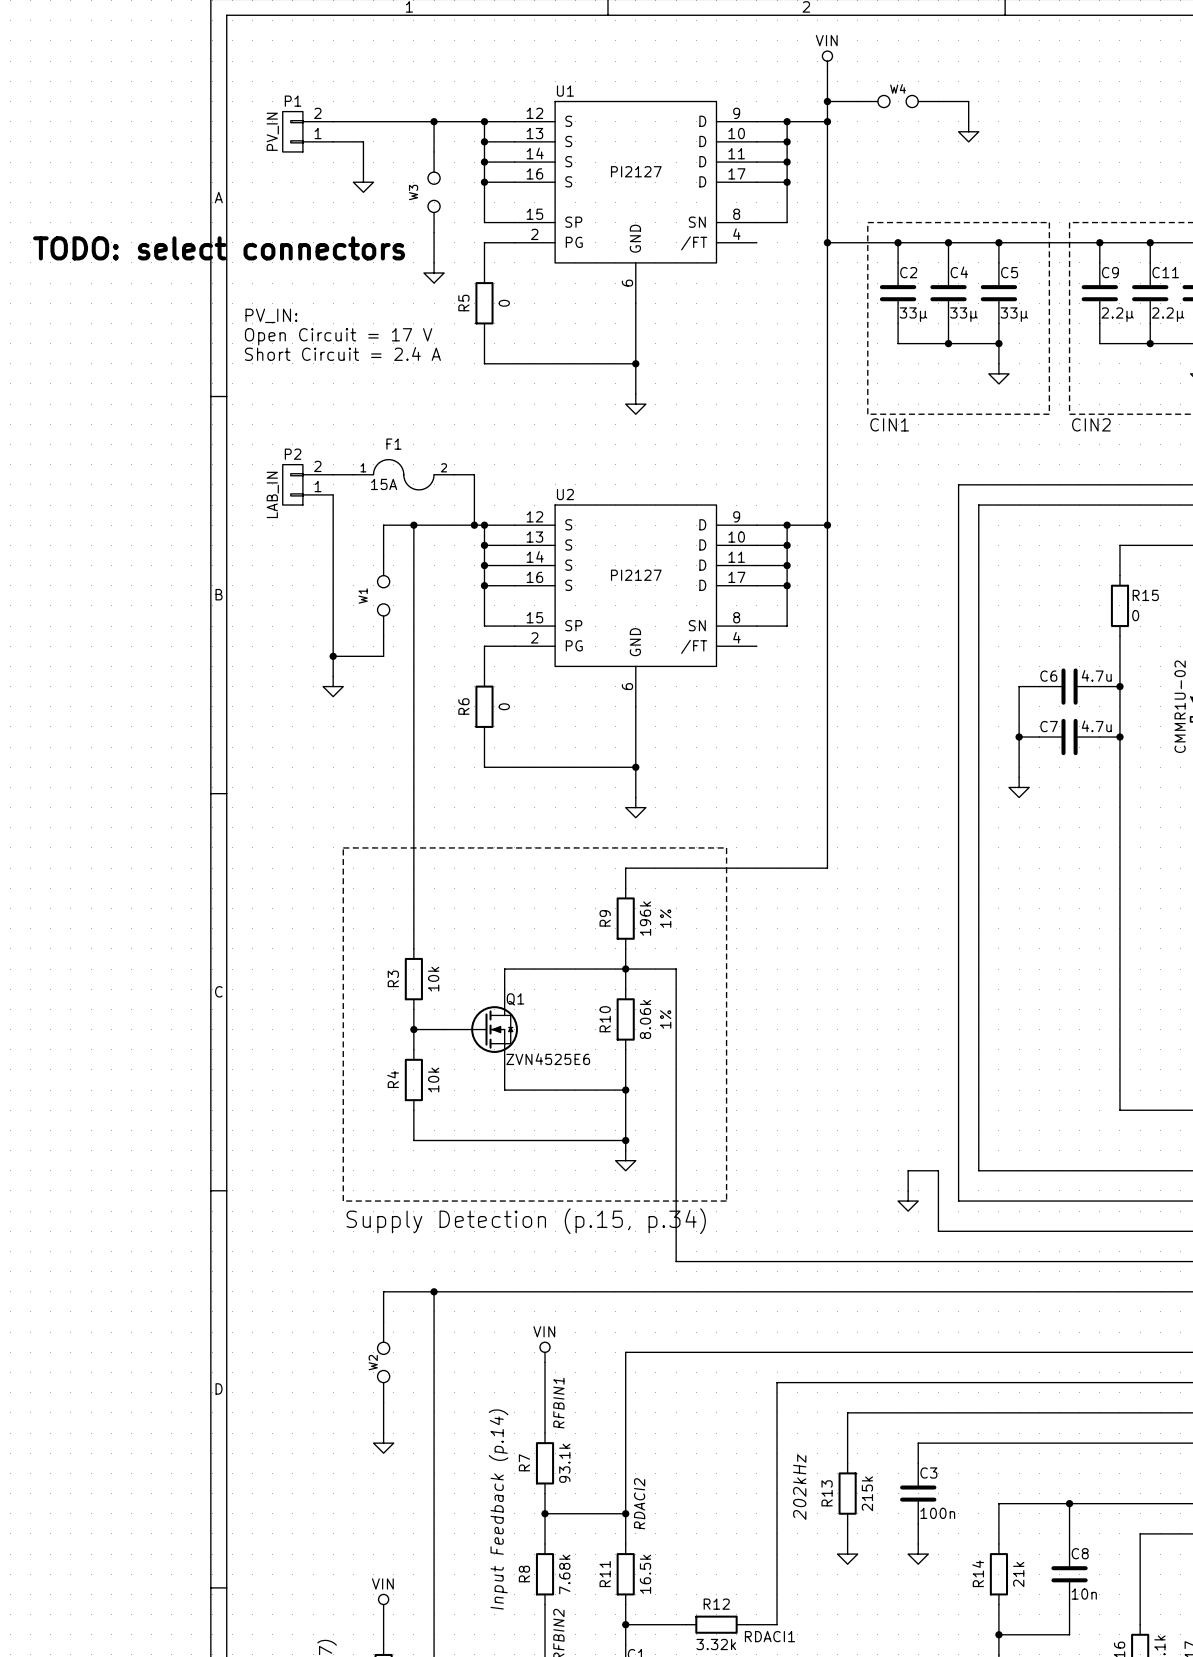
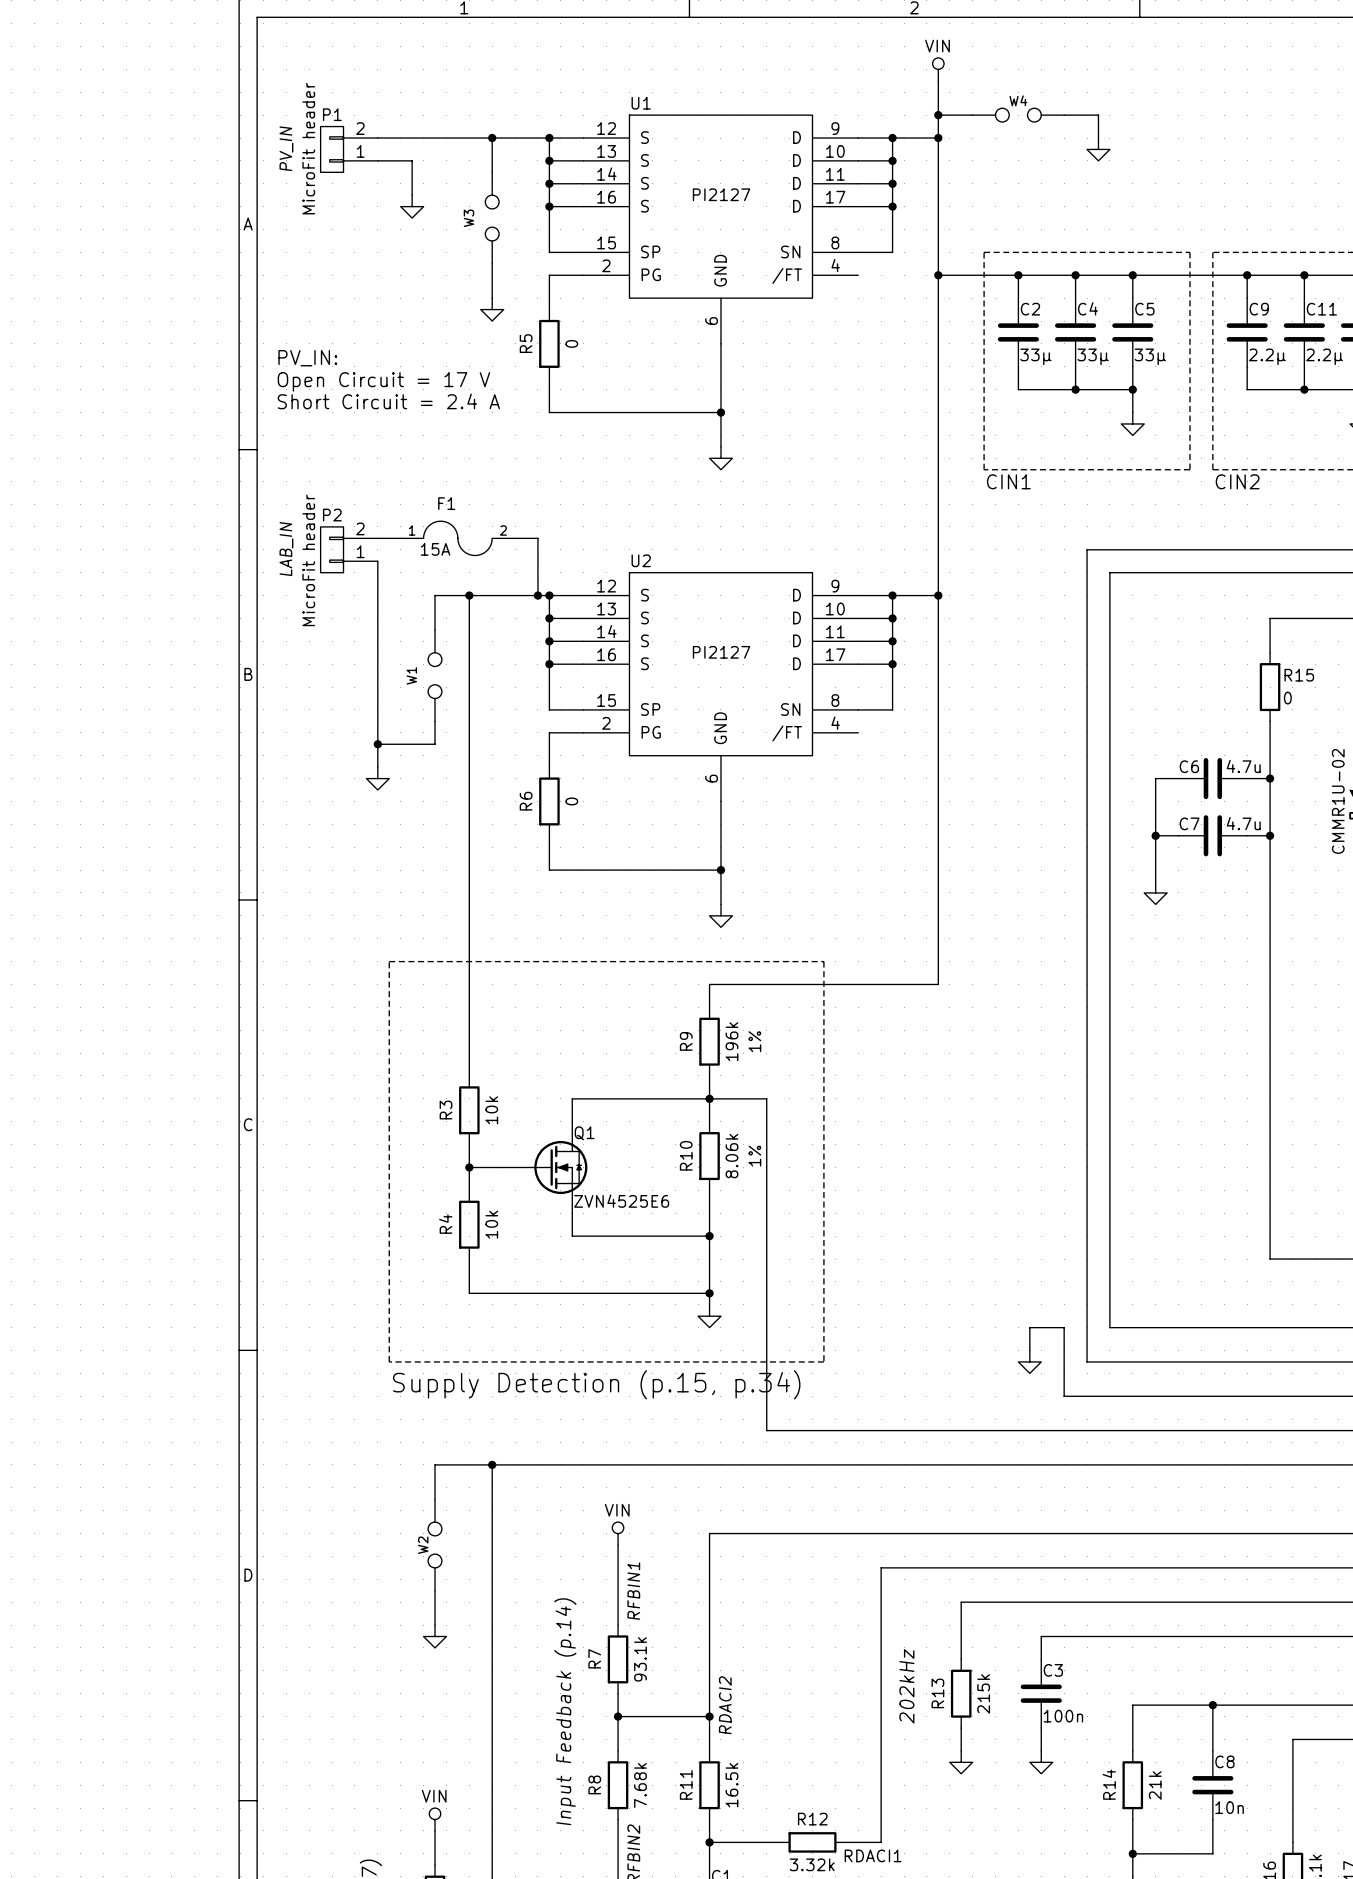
P1 text: none -> PV_IN (286, 148)
P1 value: PV_IN (272, 131) -> MicroFit header (308, 148)
text: TODO: select connectors (219, 248) -> none
P2 text: none -> LAB_IN (286, 549)
P2 value: LAB_IN (272, 494) -> MicroFit header (308, 560)

